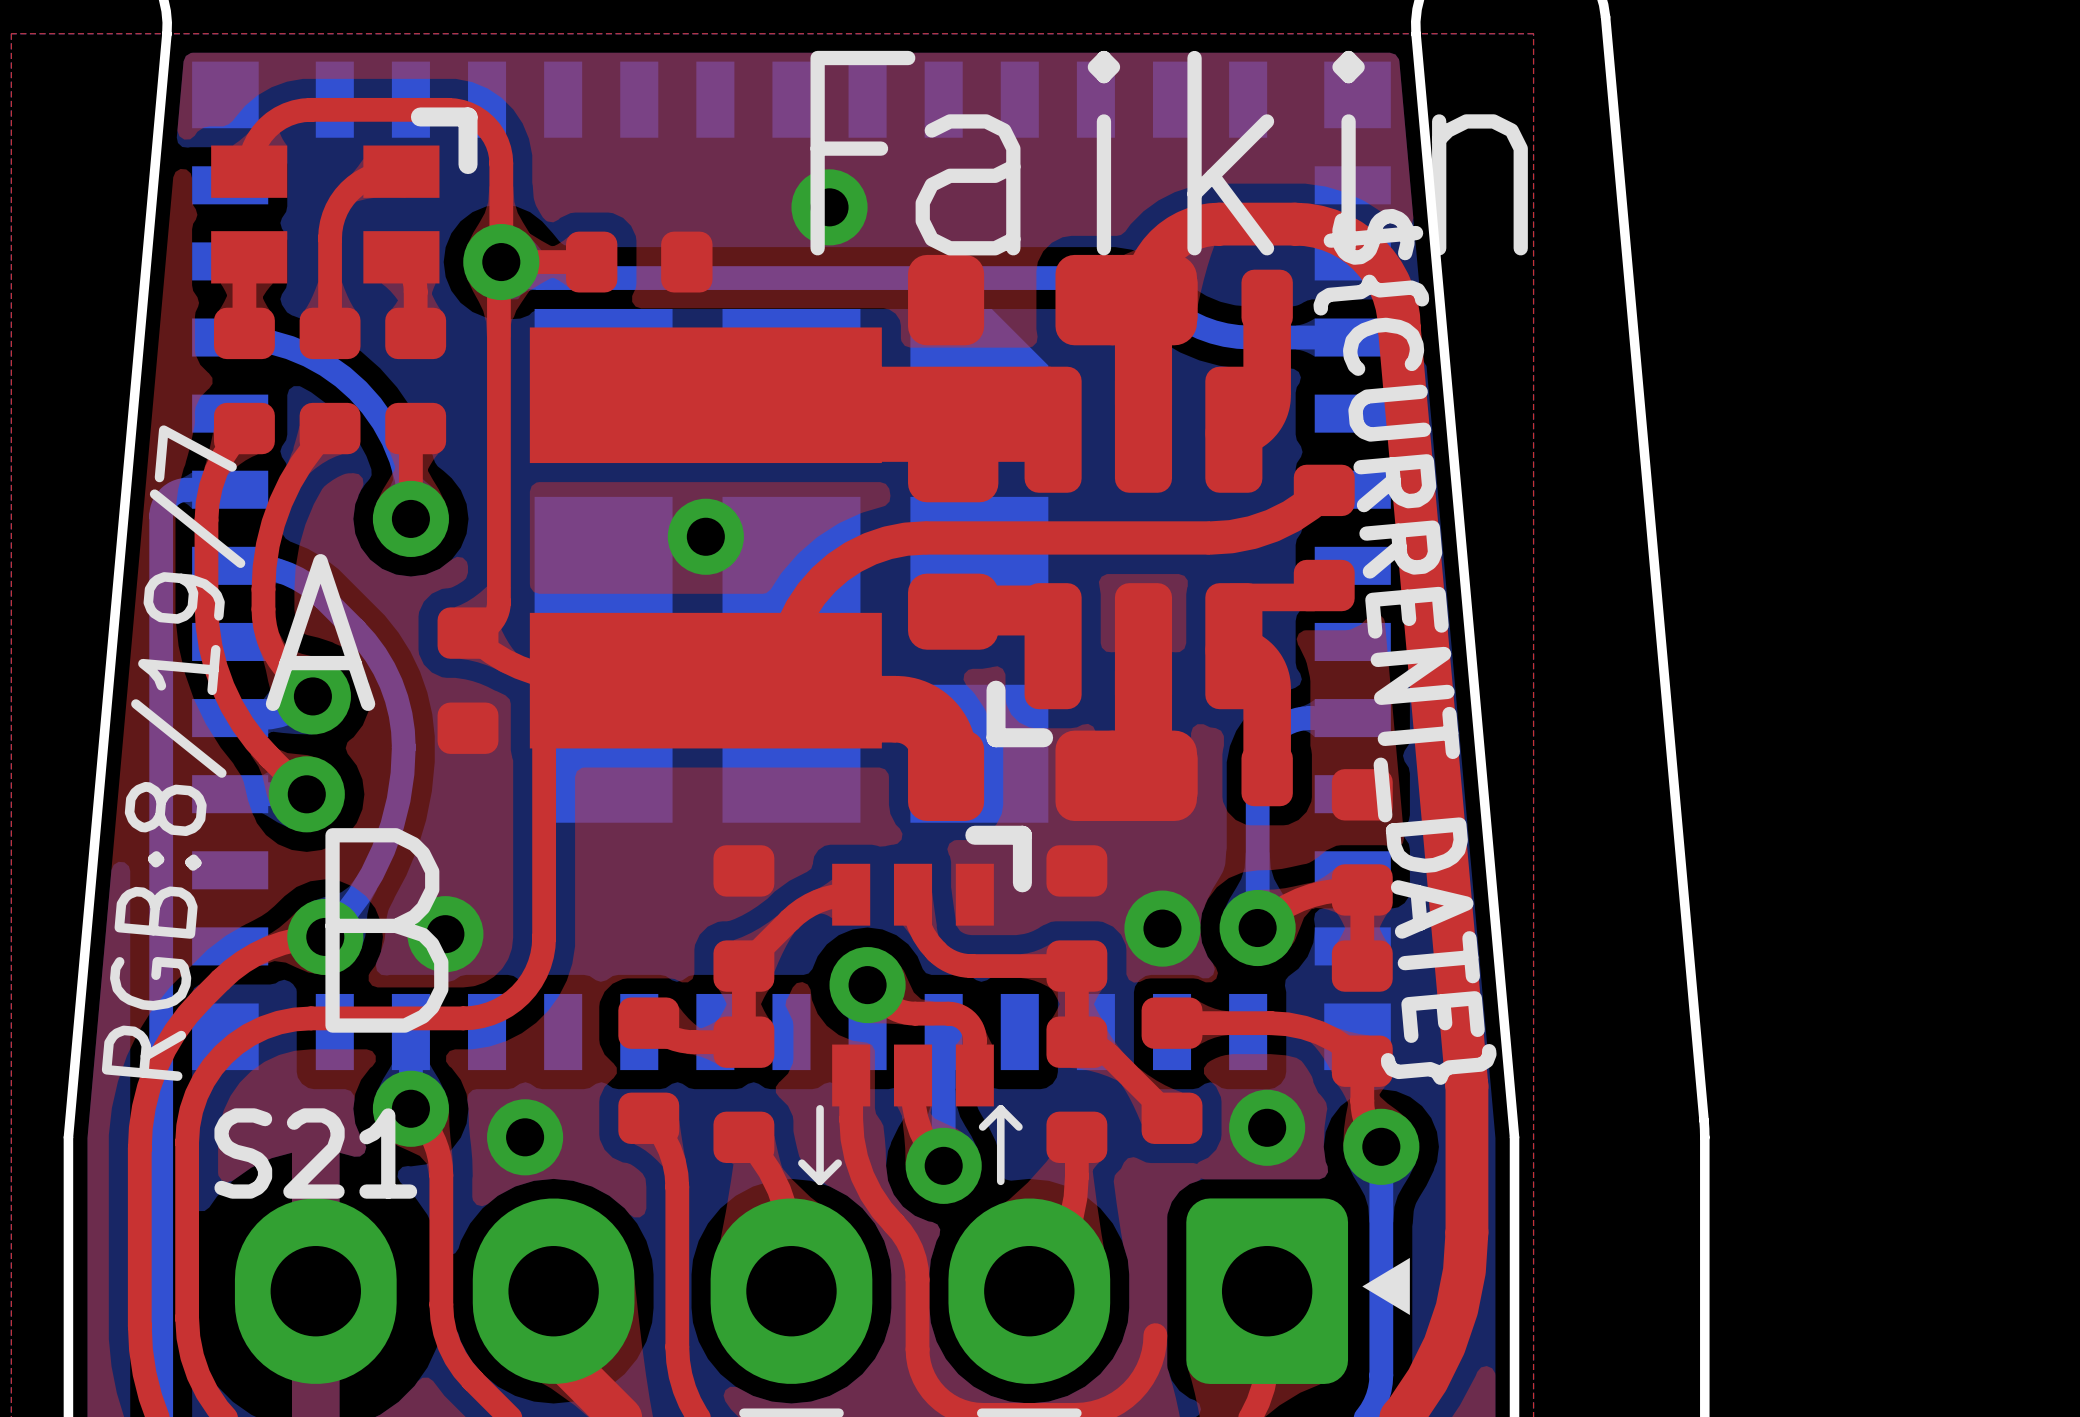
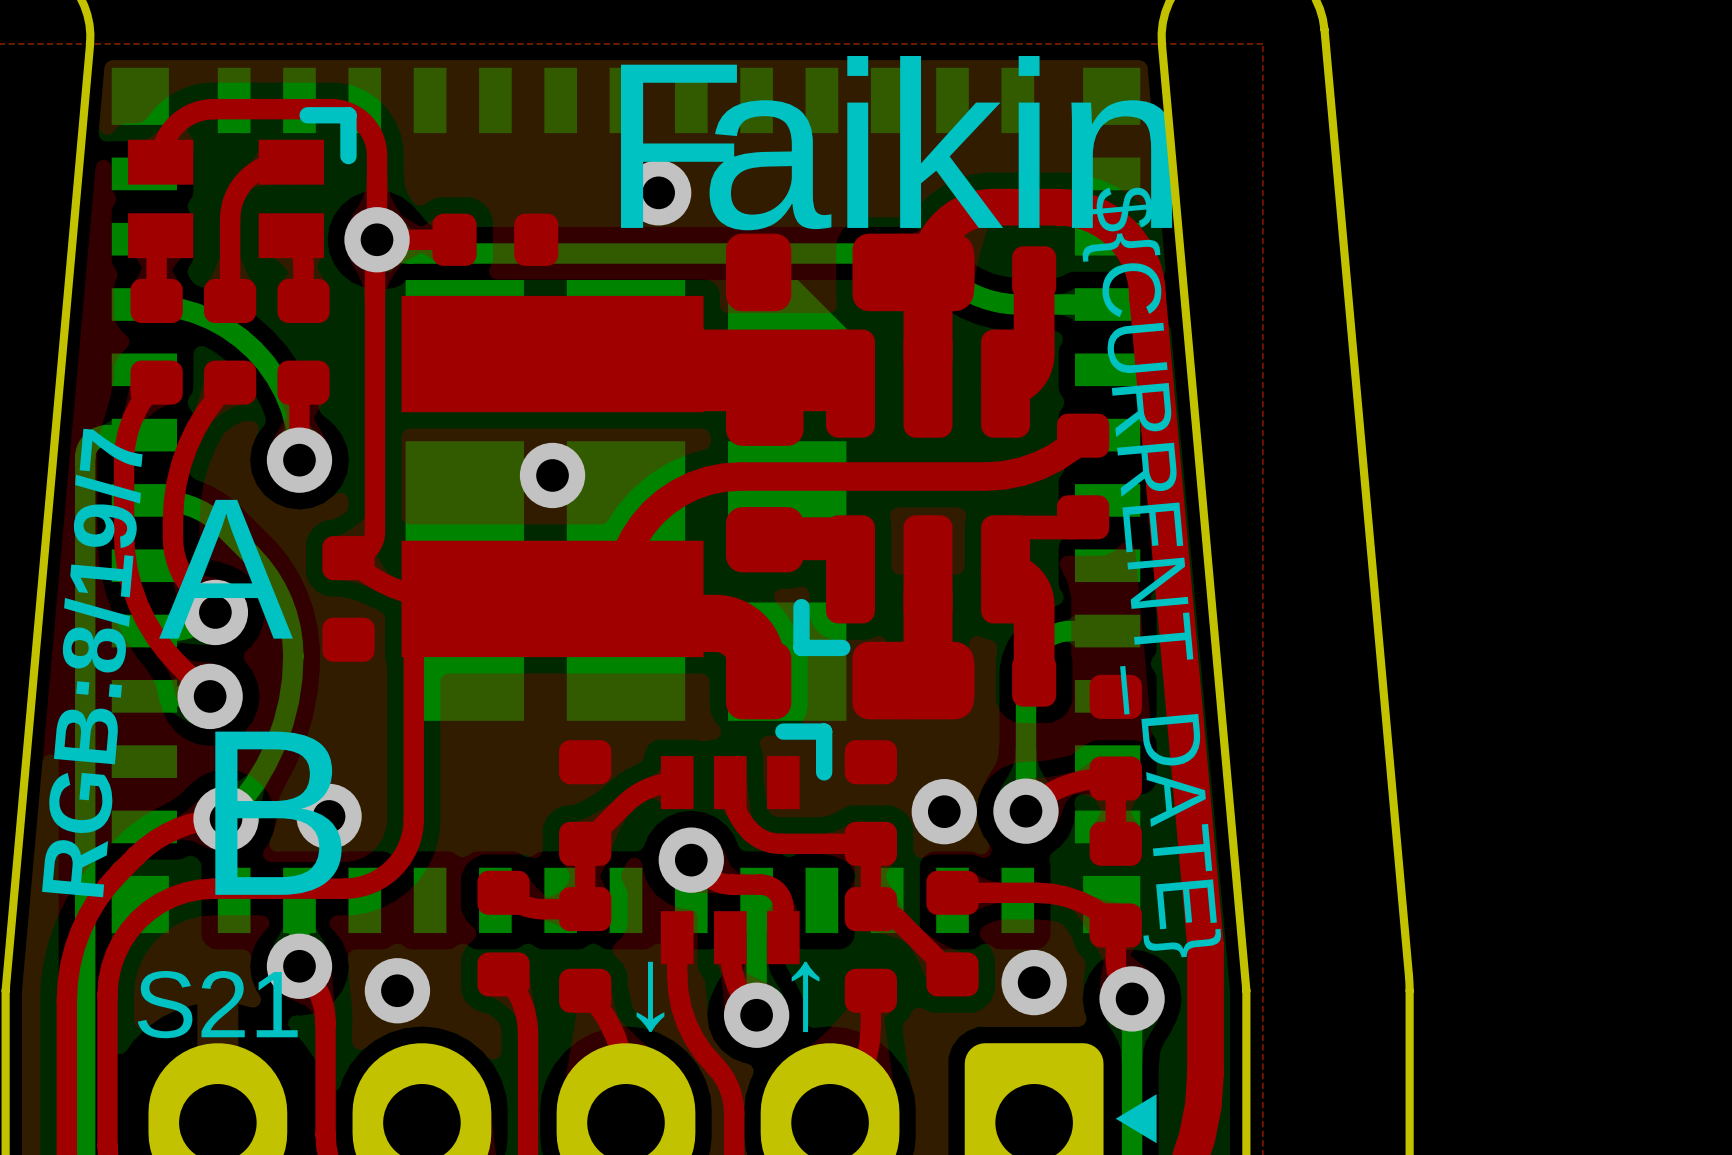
text position: A (320, 632) -> A (226, 569)

